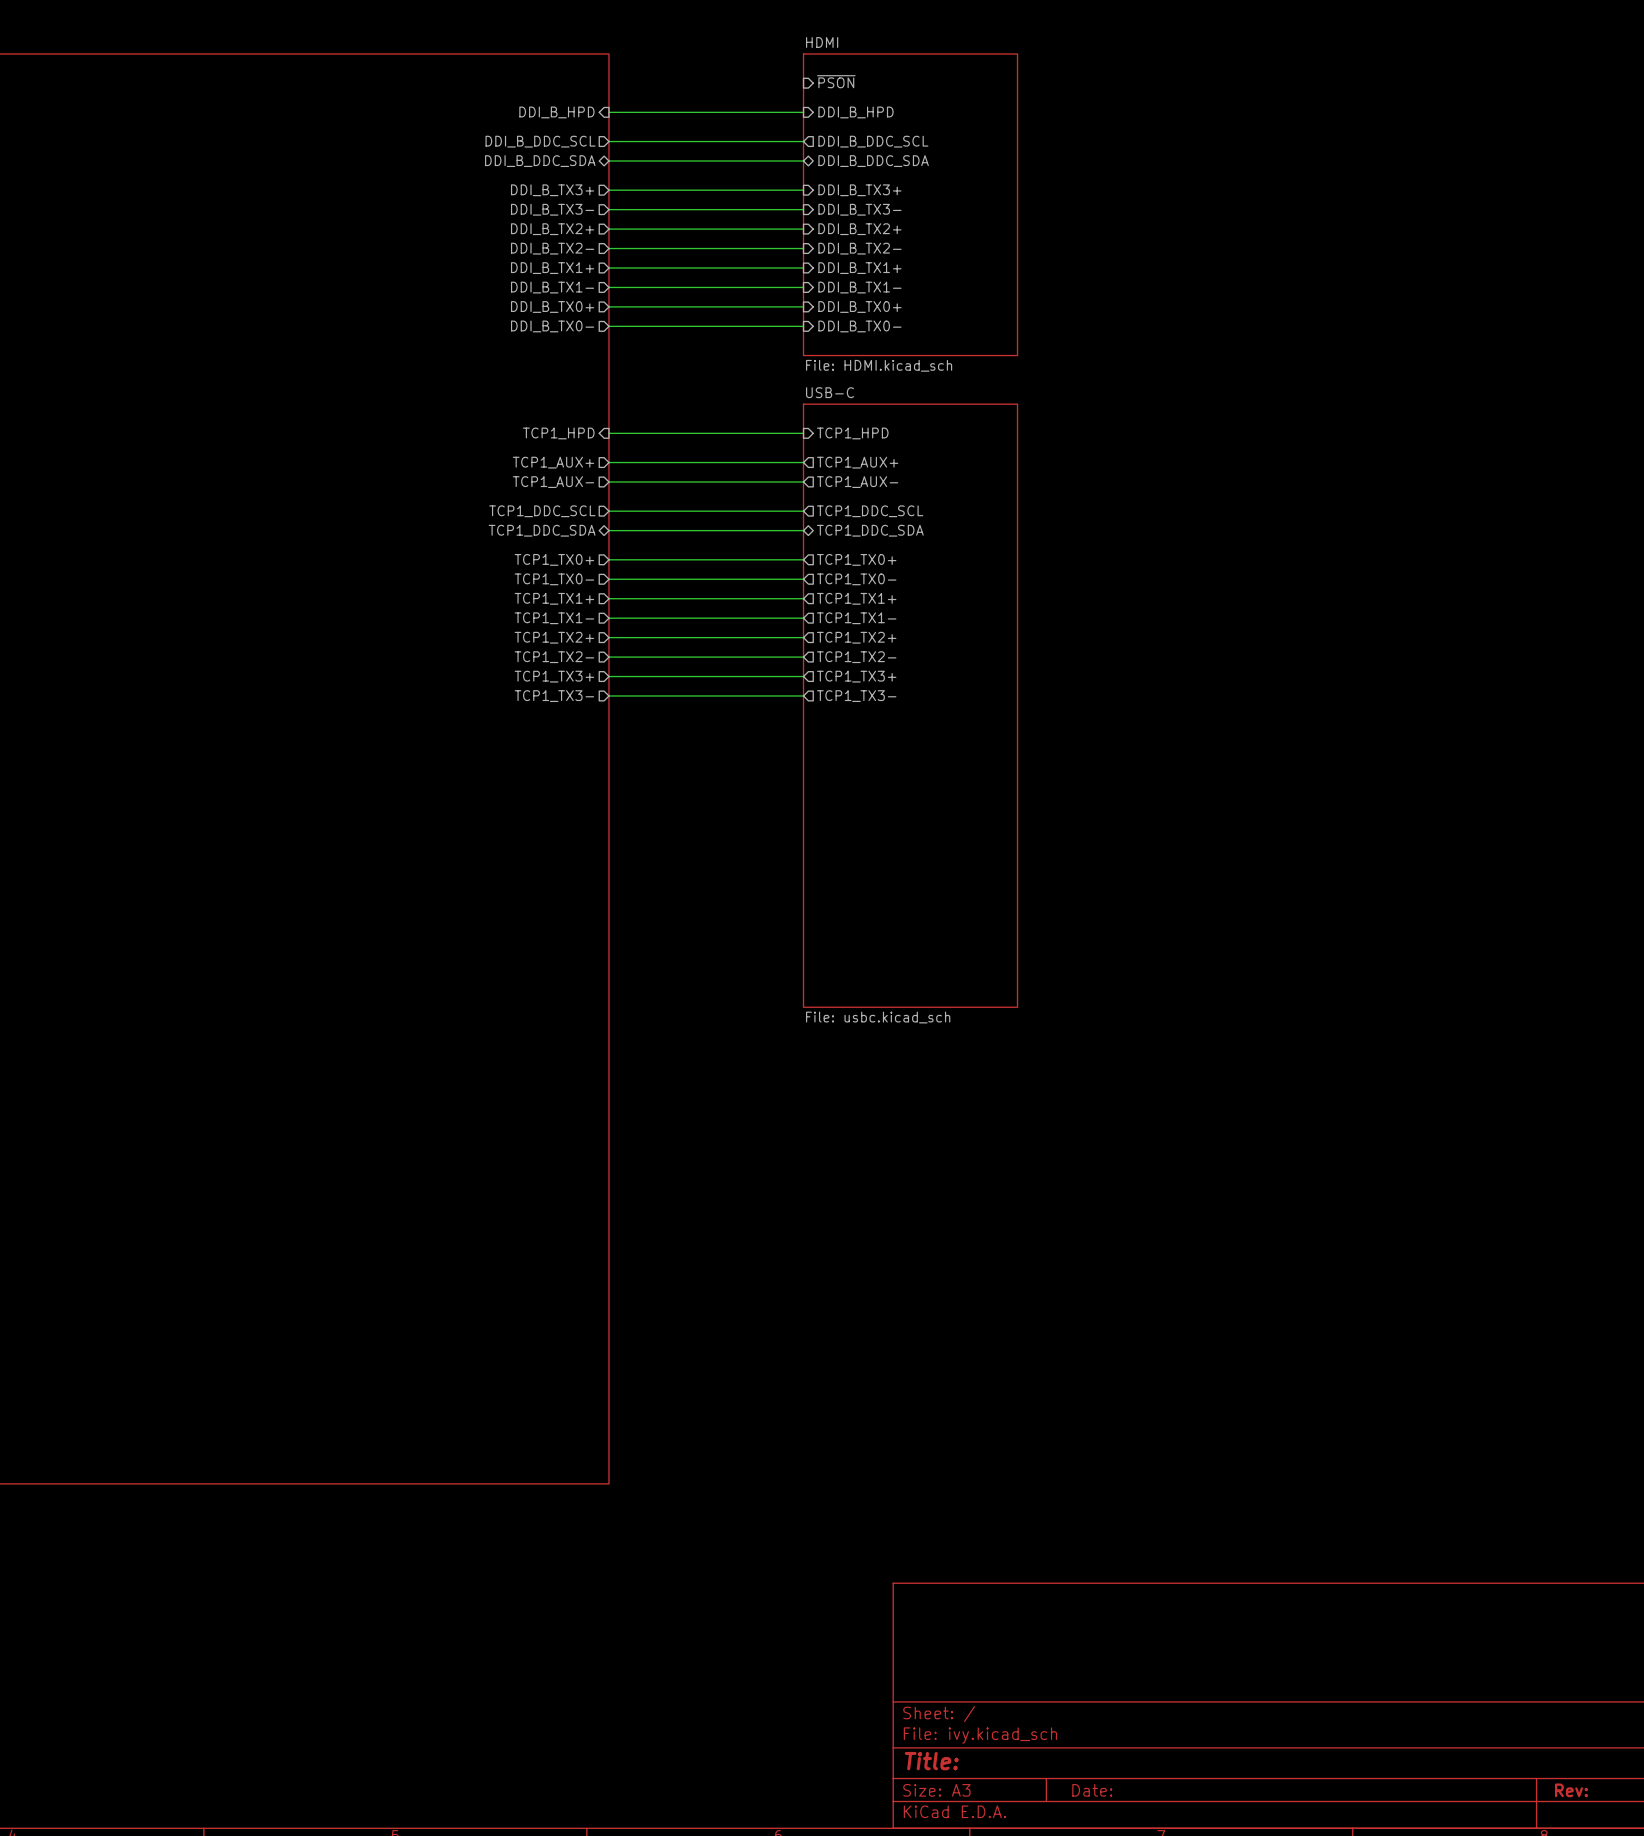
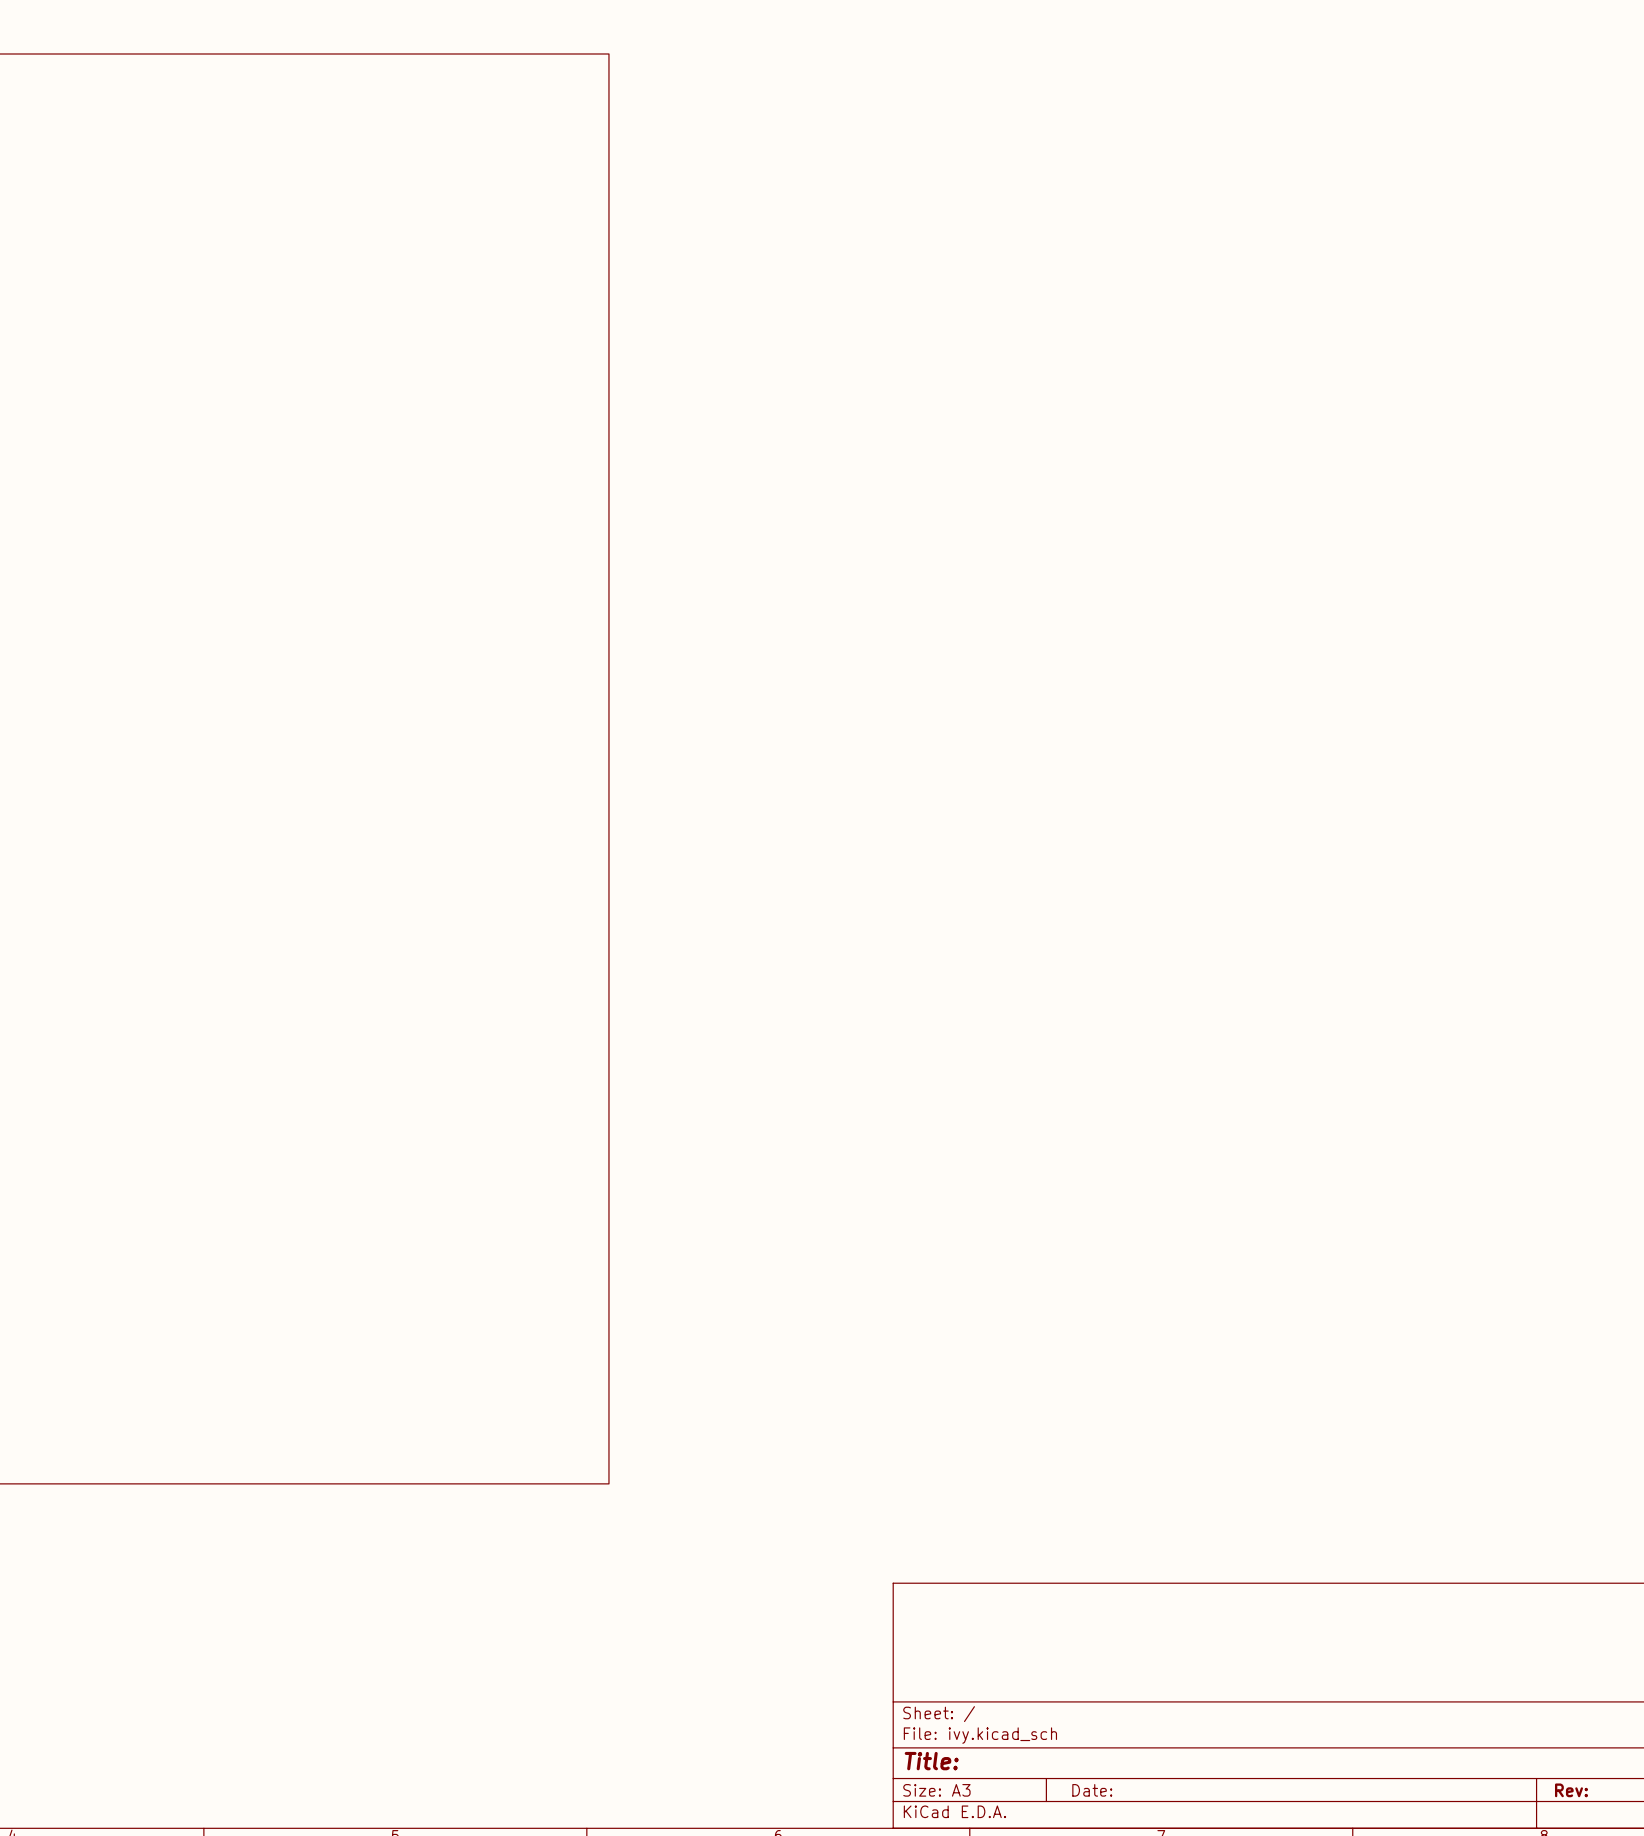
sheet pin: ~{PSON} (836, 81) -> none
sheet pin: DDI_B_HPD (556, 112) -> none
wire: (608, 112) (803, 112) -> none
sheet pin: DDI_B_HPD (856, 112) -> none
sheet pin: DDI_B_DDC_SCL (540, 141) -> none
wire: (608, 141) (803, 141) -> none
sheet pin: DDI_B_DDC_SCL (873, 141) -> none
wire: (608, 160) (803, 160) -> none
sheet pin: DDI_B_DDC_SDA (540, 161) -> none
sheet pin: DDI_B_DDC_SDA (873, 161) -> none
sheet pin: DDI_B_TX3+ (552, 190) -> none
wire: (608, 190) (803, 190) -> none
sheet pin: DDI_B_TX3+ (859, 190) -> none
sheet HDMI: File: HDMI.kicad_sch (910, 204) -> none
sheet pin: DDI_B_TX3- (552, 209) -> none
wire: (608, 209) (803, 209) -> none
sheet pin: DDI_B_TX3- (859, 209) -> none
sheet pin: DDI_B_TX2+ (552, 229) -> none
wire: (608, 229) (803, 229) -> none
sheet pin: DDI_B_TX2+ (859, 229) -> none
sheet pin: DDI_B_TX2- (552, 248) -> none
wire: (608, 248) (803, 248) -> none
sheet pin: DDI_B_TX2- (859, 248) -> none
wire: (608, 267) (803, 267) -> none
sheet pin: DDI_B_TX1+ (552, 268) -> none
sheet pin: DDI_B_TX1+ (859, 268) -> none
sheet pin: DDI_B_TX1- (552, 287) -> none
wire: (608, 287) (803, 287) -> none
sheet pin: DDI_B_TX1- (859, 287) -> none
wire: (608, 306) (803, 306) -> none
sheet pin: DDI_B_TX0+ (552, 307) -> none
sheet pin: DDI_B_TX0+ (859, 307) -> none
sheet pin: DDI_B_TX0- (552, 326) -> none
wire: (608, 326) (803, 326) -> none
sheet pin: DDI_B_TX0- (859, 326) -> none
sheet pin: TCP1_HPD (558, 433) -> none
wire: (608, 433) (803, 433) -> none
sheet pin: TCP1_HPD (852, 433) -> none
sheet pin: TCP1_AUX+ (553, 462) -> none
wire: (608, 462) (803, 462) -> none
sheet pin: TCP1_AUX+ (857, 462) -> none
wire: (608, 481) (803, 481) -> none
sheet pin: TCP1_AUX- (553, 482) -> none
sheet pin: TCP1_AUX- (857, 482) -> none
sheet pin: TCP1_DDC_SCL (542, 511) -> none
wire: (608, 511) (803, 511) -> none
sheet pin: TCP1_DDC_SCL (870, 511) -> none
sheet pin: TCP1_DDC_SDA (542, 530) -> none
wire: (608, 530) (803, 530) -> none
sheet pin: TCP1_DDC_SDA (870, 530) -> none
sheet pin: TCP1_TX0+ (554, 559) -> none
wire: (608, 559) (803, 559) -> none
sheet pin: TCP1_TX0+ (856, 559) -> none
sheet pin: TCP1_TX0- (554, 579) -> none
wire: (608, 579) (803, 579) -> none
sheet pin: TCP1_TX0- (856, 579) -> none
sheet pin: TCP1_TX1+ (554, 598) -> none
wire: (608, 598) (803, 598) -> none
sheet pin: TCP1_TX1+ (856, 598) -> none
sheet pin: TCP1_TX1- (554, 618) -> none
wire: (608, 618) (803, 618) -> none
sheet pin: TCP1_TX1- (856, 618) -> none
sheet pin: TCP1_TX2+ (554, 637) -> none
wire: (608, 637) (803, 637) -> none
sheet pin: TCP1_TX2+ (856, 637) -> none
sheet pin: TCP1_TX2- (554, 657) -> none
wire: (608, 657) (803, 657) -> none
sheet pin: TCP1_TX2- (856, 657) -> none
sheet pin: TCP1_TX3+ (554, 676) -> none
wire: (608, 676) (803, 676) -> none
sheet pin: TCP1_TX3+ (856, 676) -> none
wire: (608, 695) (803, 695) -> none
sheet pin: TCP1_TX3- (554, 696) -> none
sheet pin: TCP1_TX3- (856, 696) -> none
sheet USB-C: File: usbc.kicad_sch (910, 705) -> none

